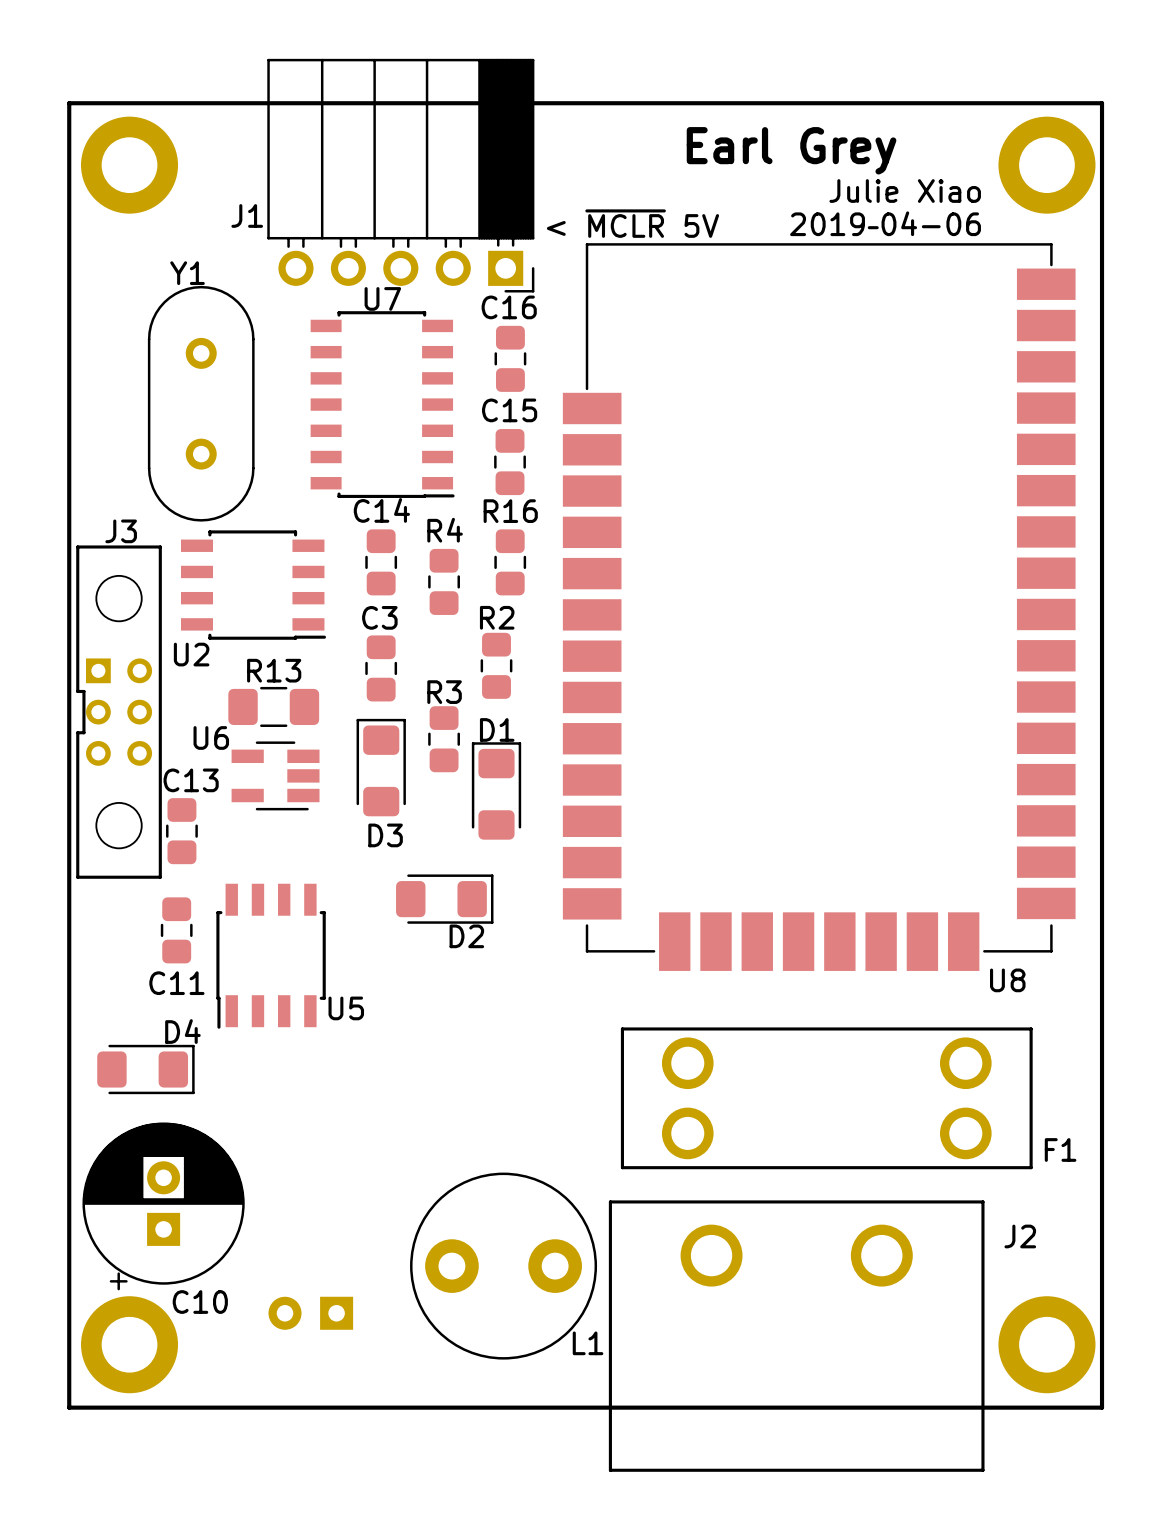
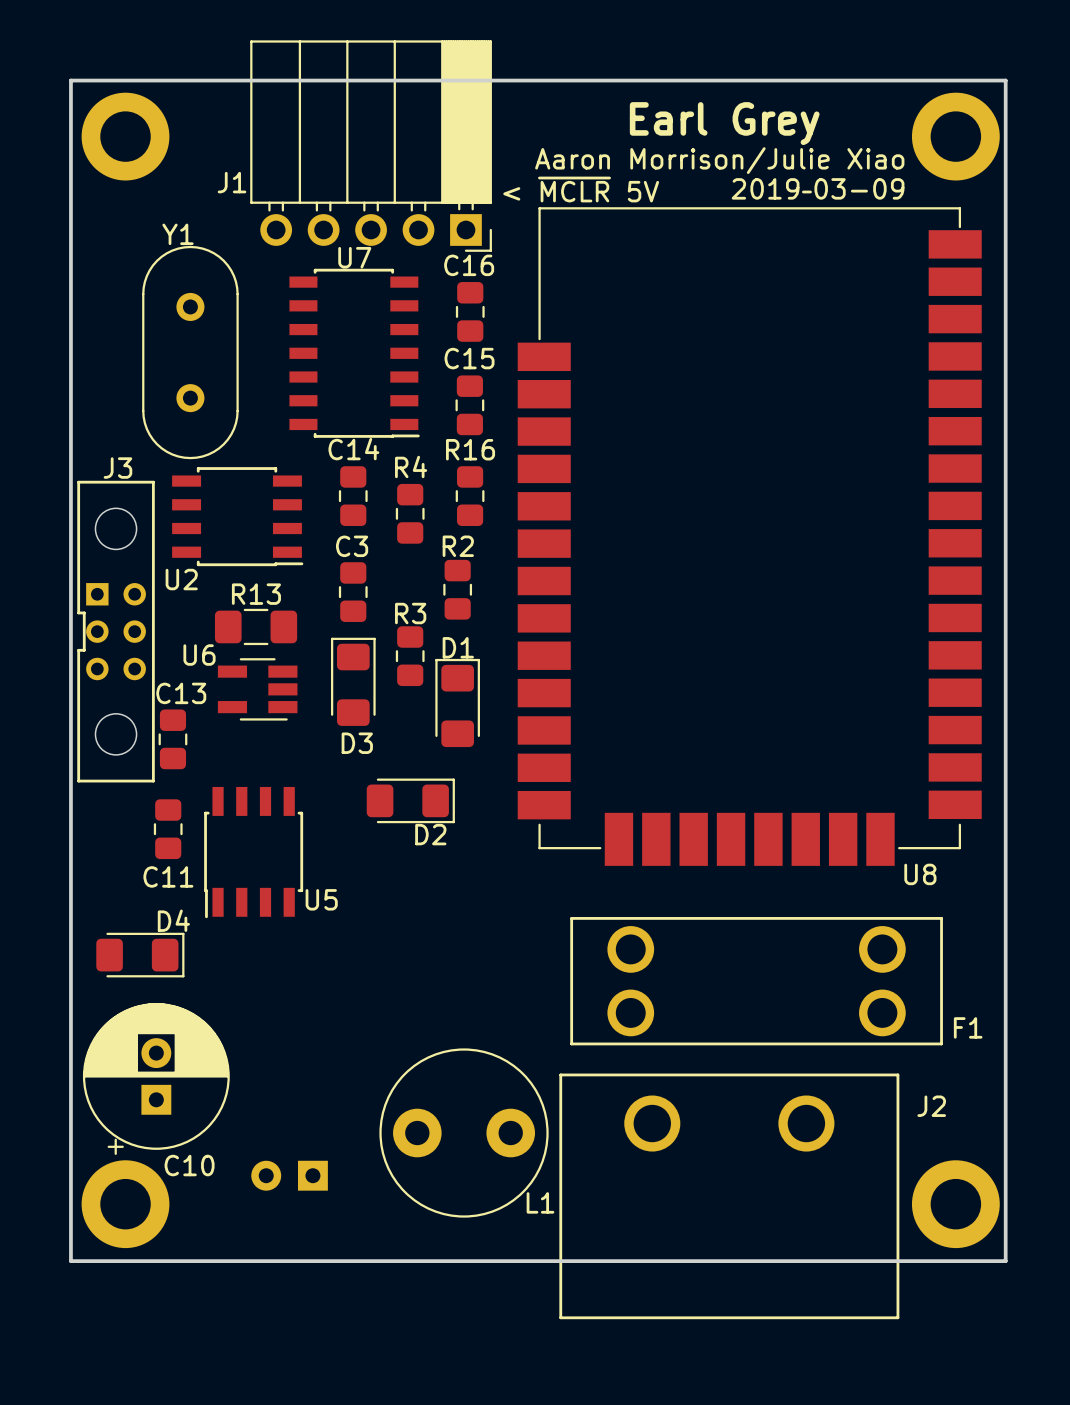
text: Julie Xiao (905, 191) -> Aaron Morrison/Julie Xiao (719, 160)
text: 2019–04-06 (885, 223) -> 2019–03-09 (818, 188)

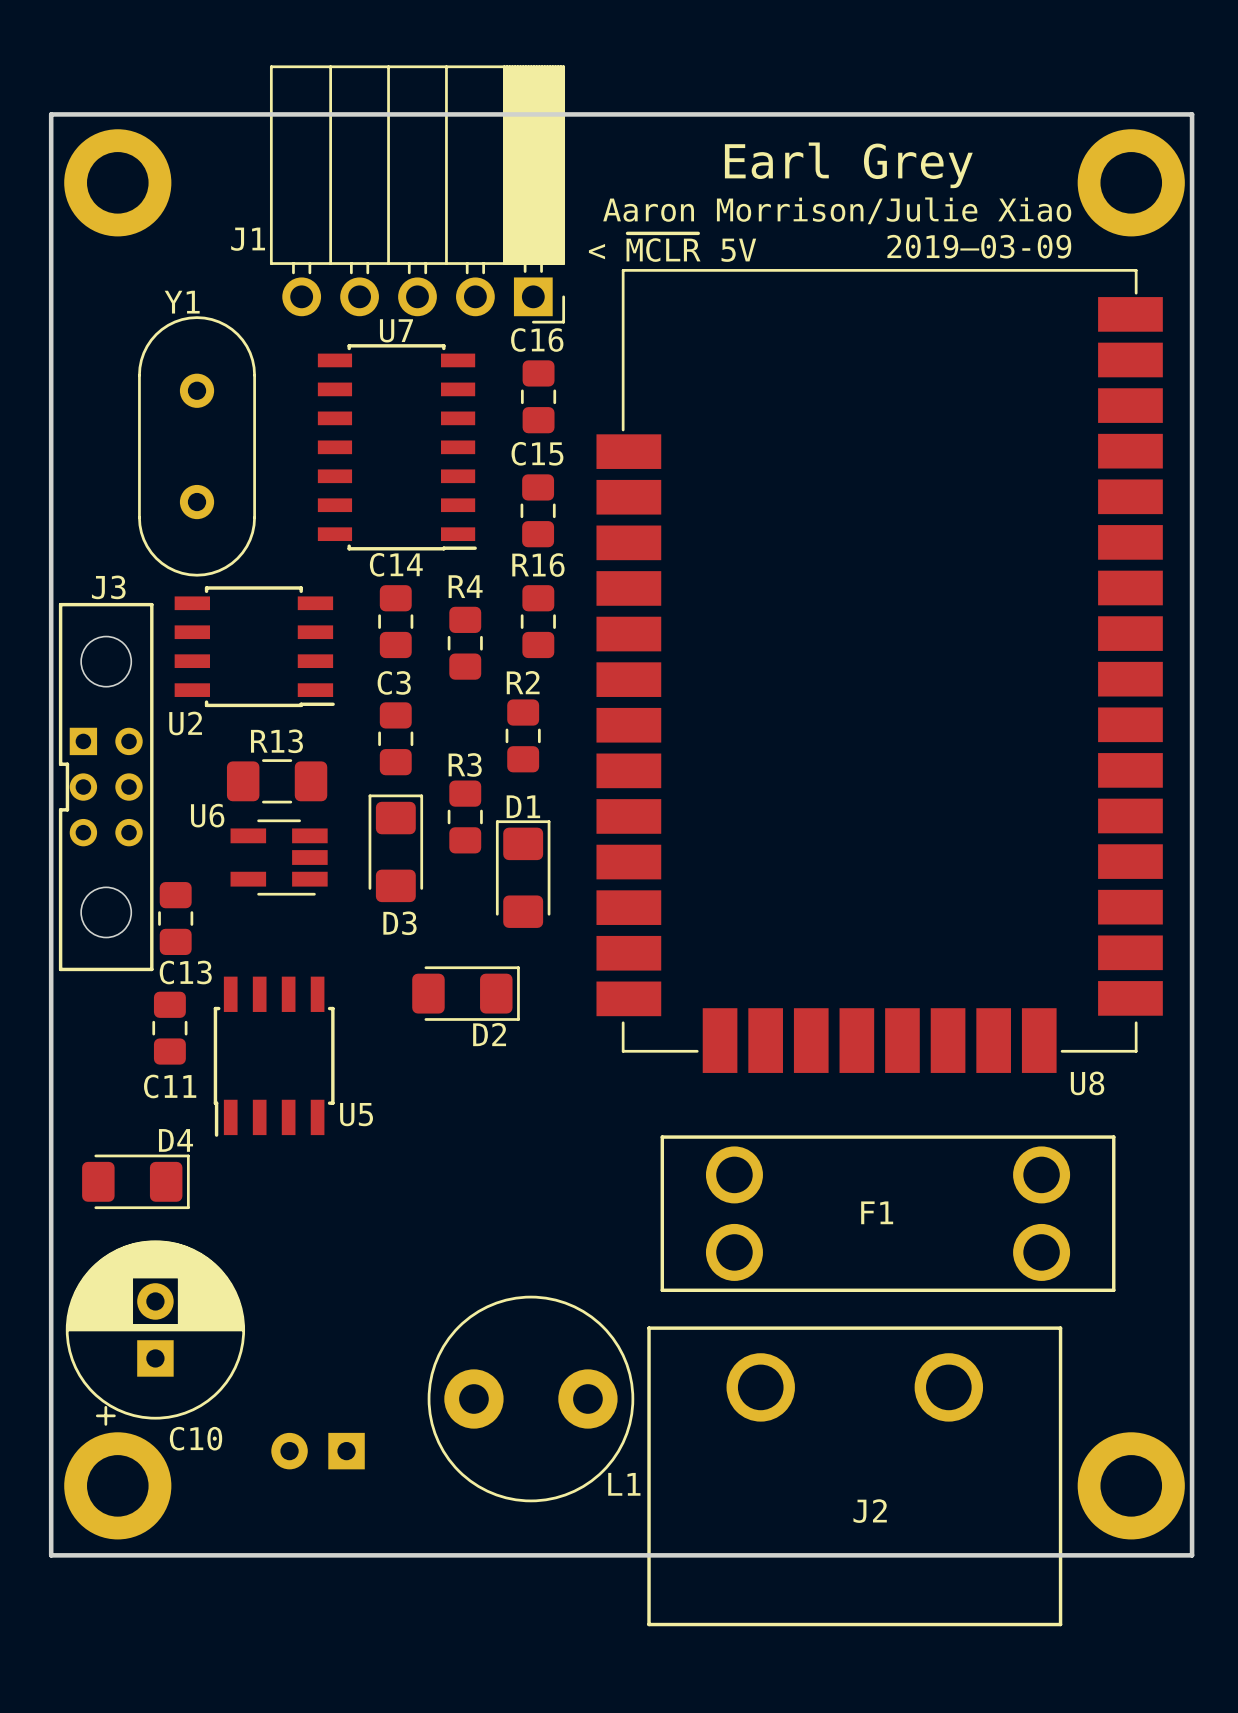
C13 name position: C13 (181, 693) -> C13 (185, 972)
F1 name position: F1 (968, 1027) -> F1 (877, 1212)
J2 name position: J2 (931, 1106) -> J2 (870, 1511)

